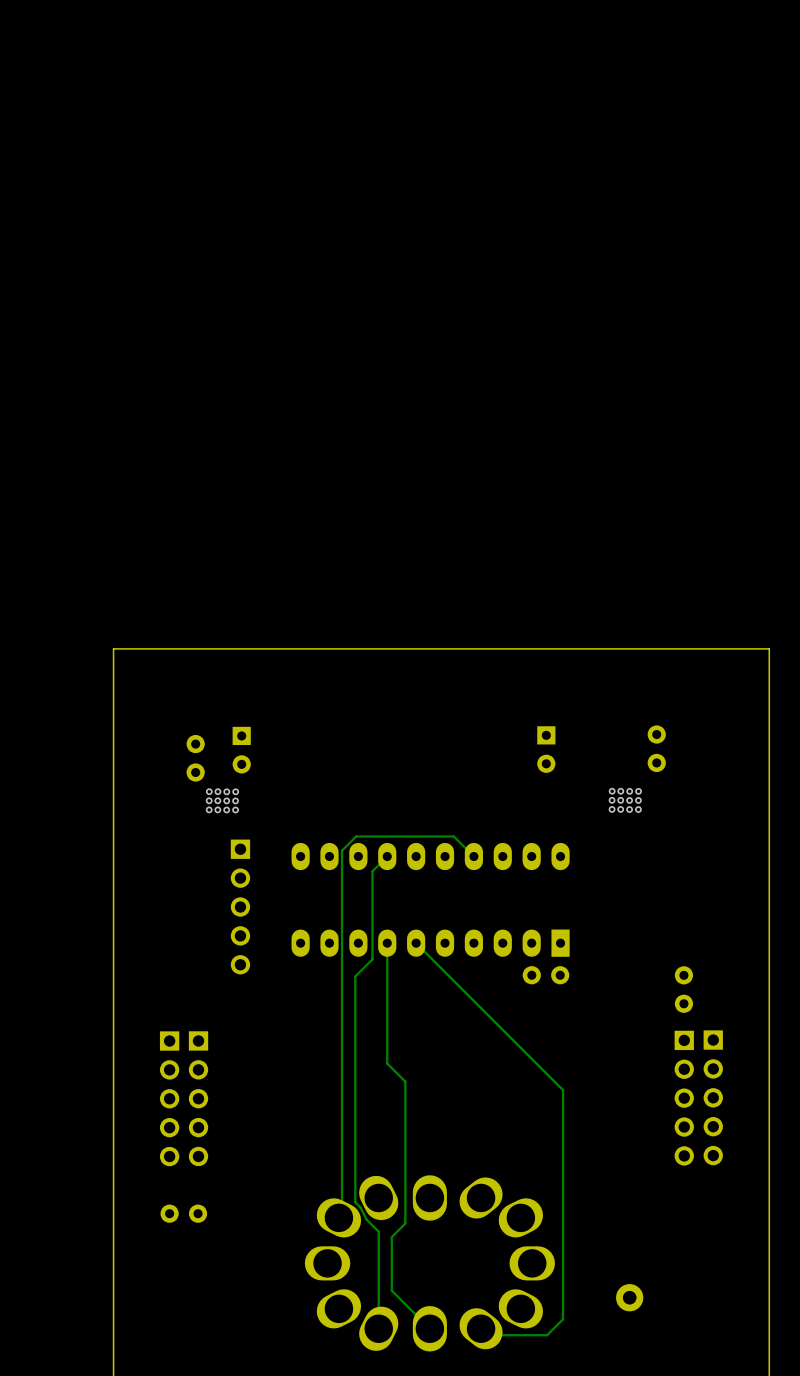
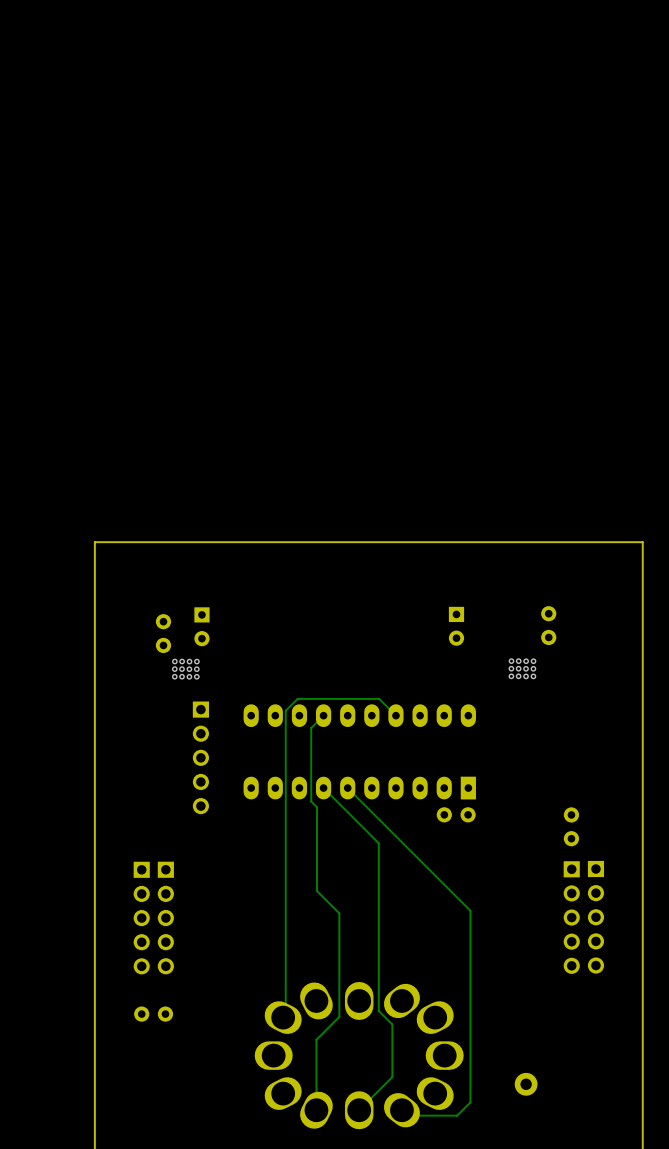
track: (387, 943) (387, 1063) (405, 1081) (405, 1223) (391, 1237) (391, 1290) (429, 1328) -> (323, 788) (378, 843) (378, 1010) (392, 1024) (392, 1077) (359, 1110)
track: (372, 959) (355, 976) (355, 1202) (360, 1207) (366, 1219) (378, 1231) (378, 1244) -> (311, 801) (317, 807) (317, 891) (339, 913) (339, 1016) (316, 1039)

